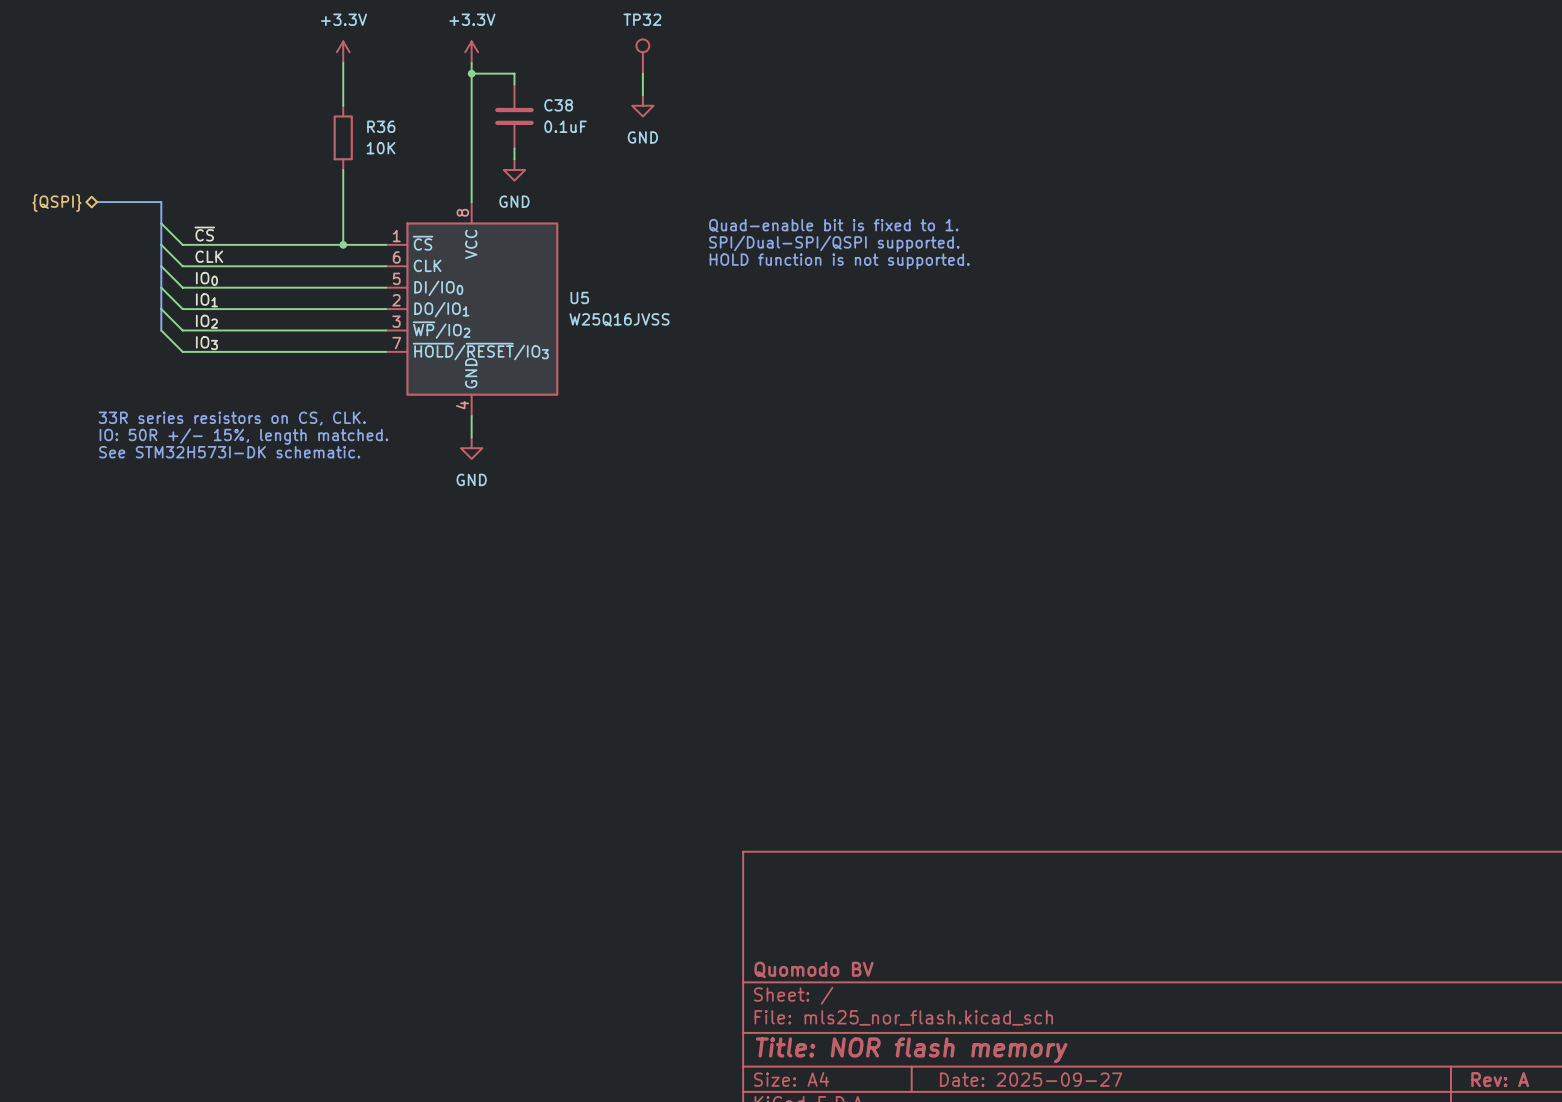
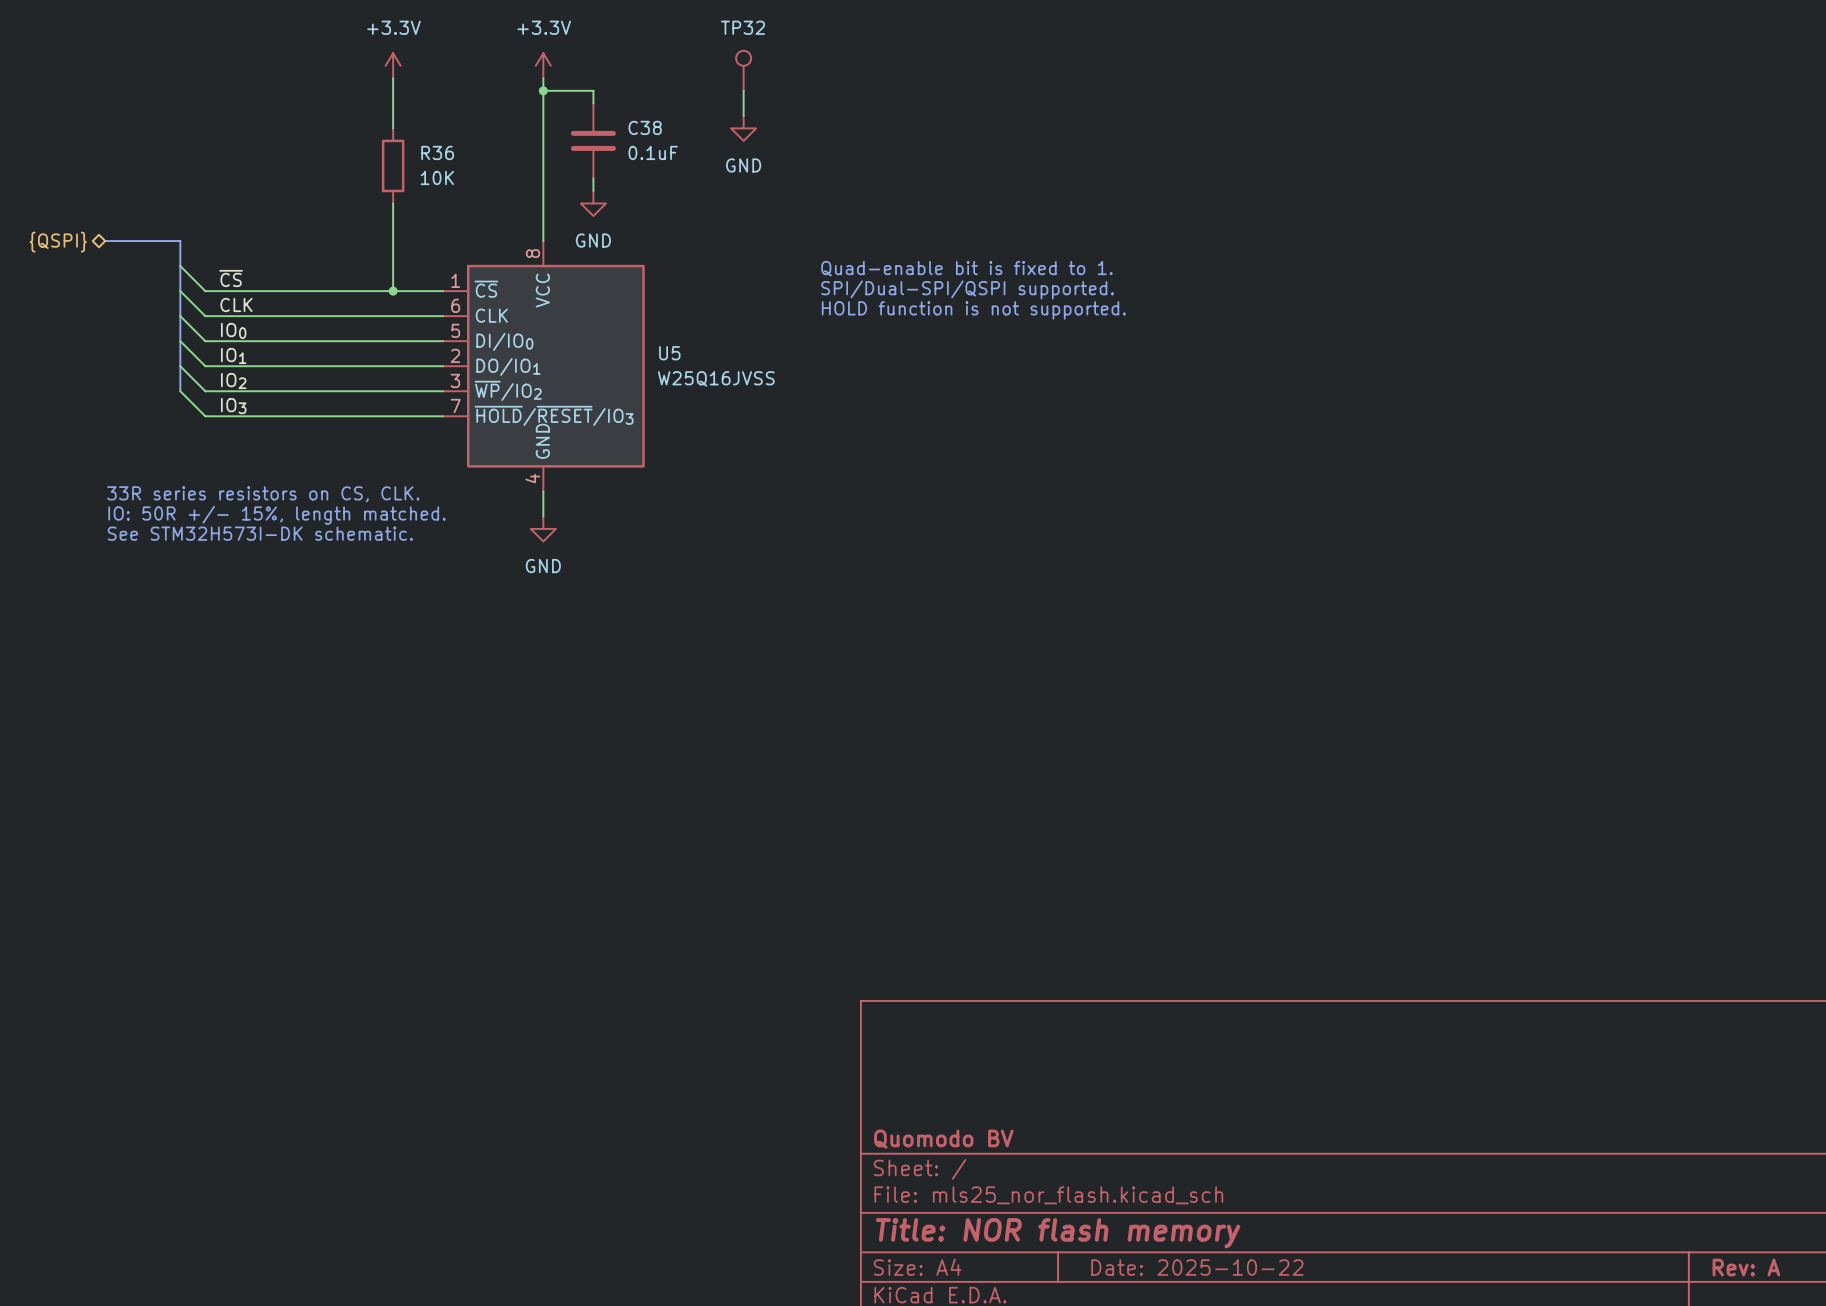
title block: Date: 2025-09-27 (1031, 1079) -> Date: 2025-10-22 (1197, 1267)

